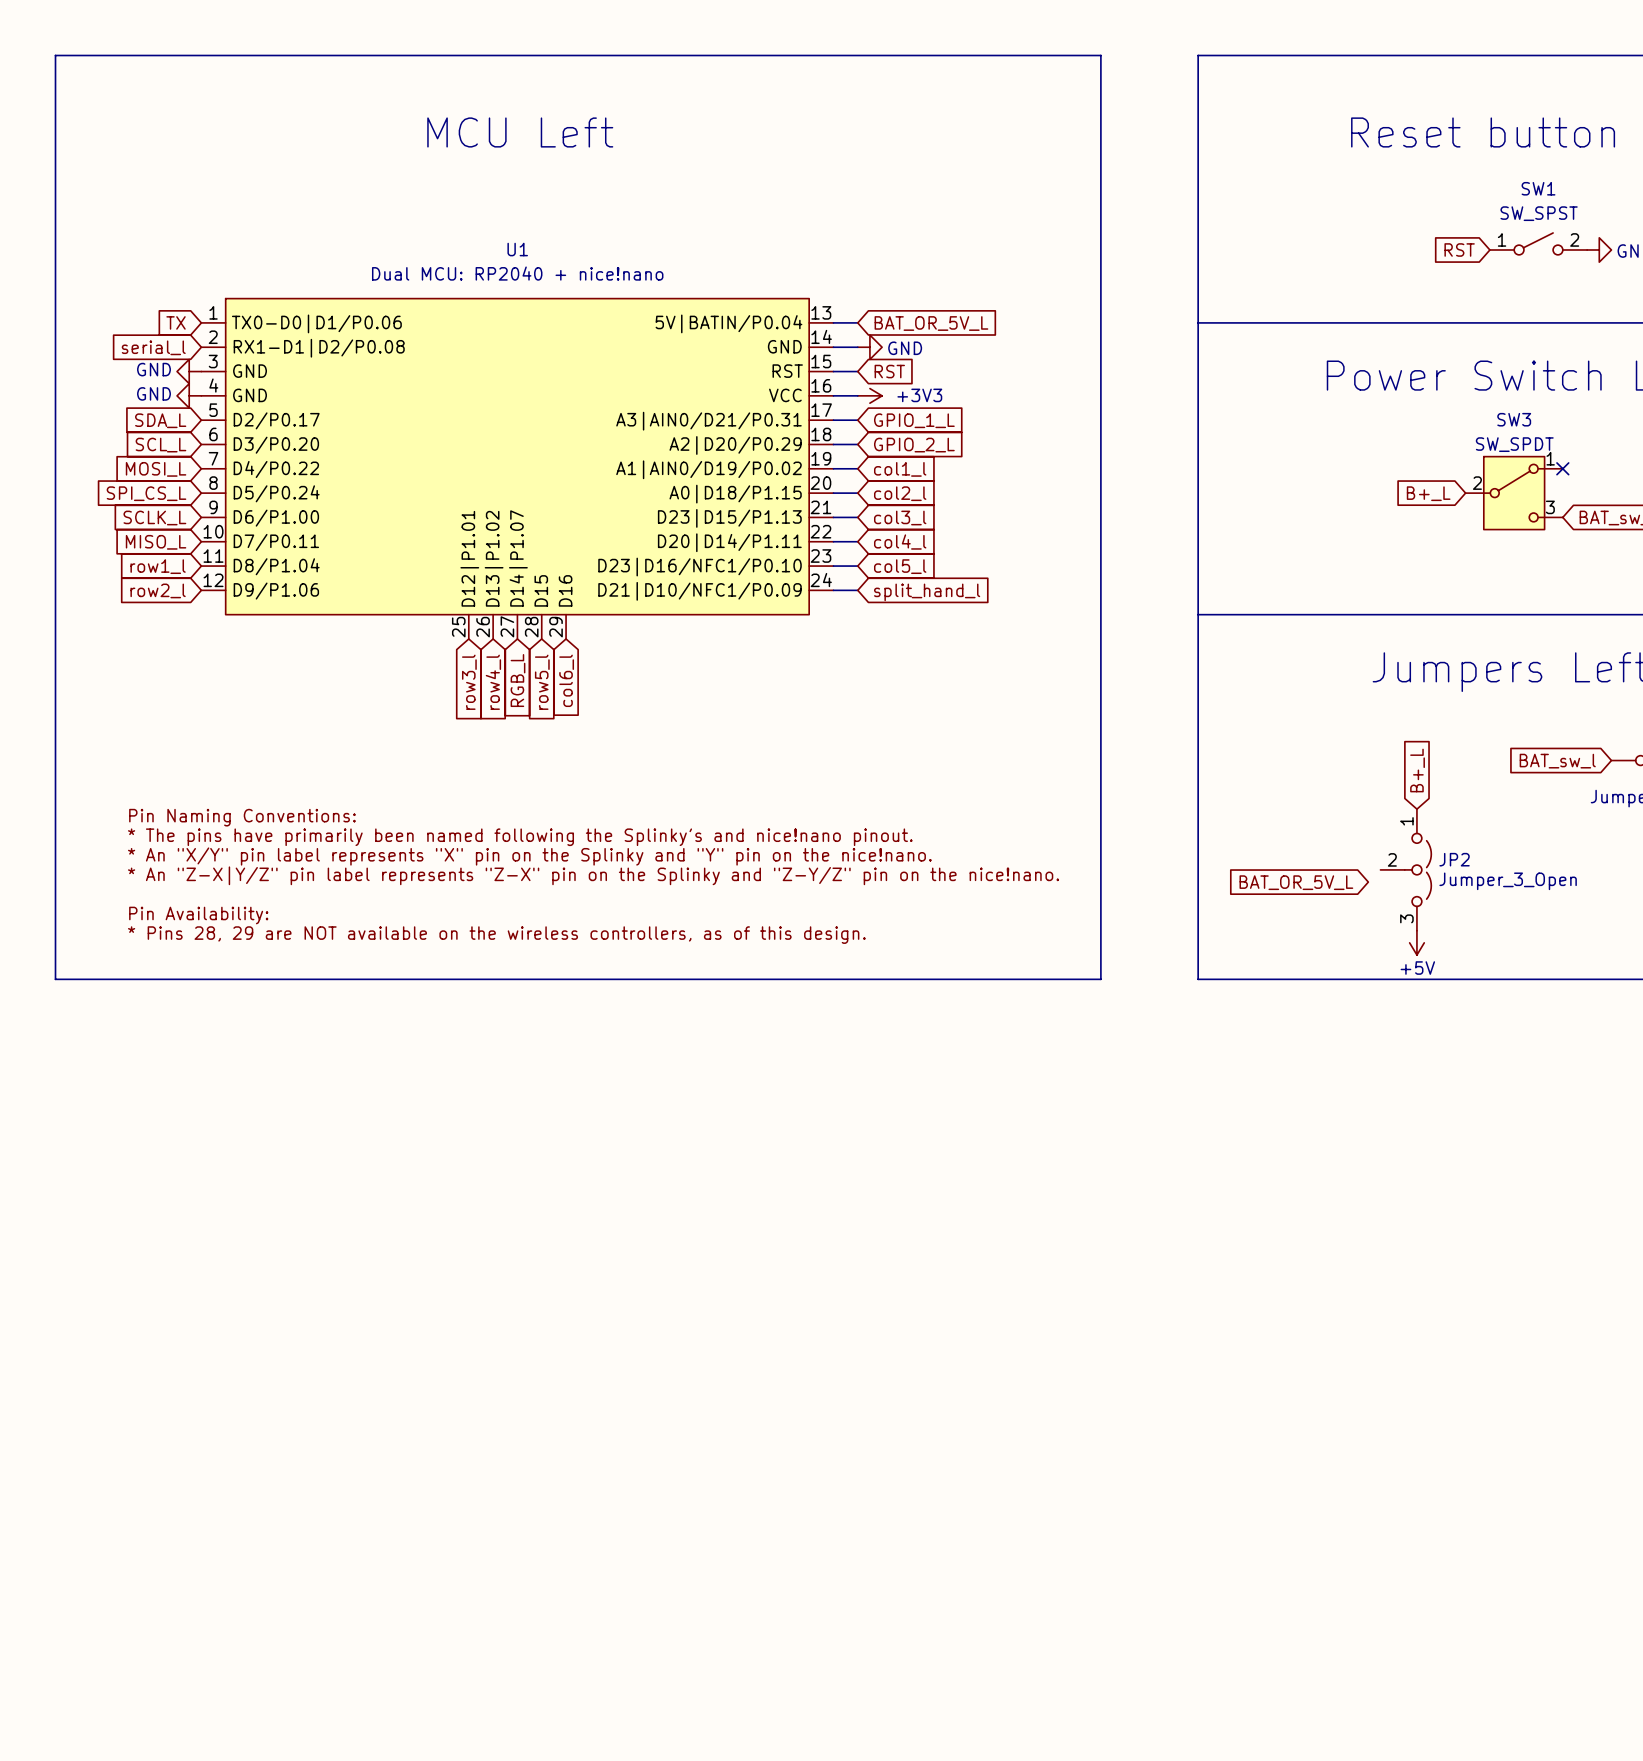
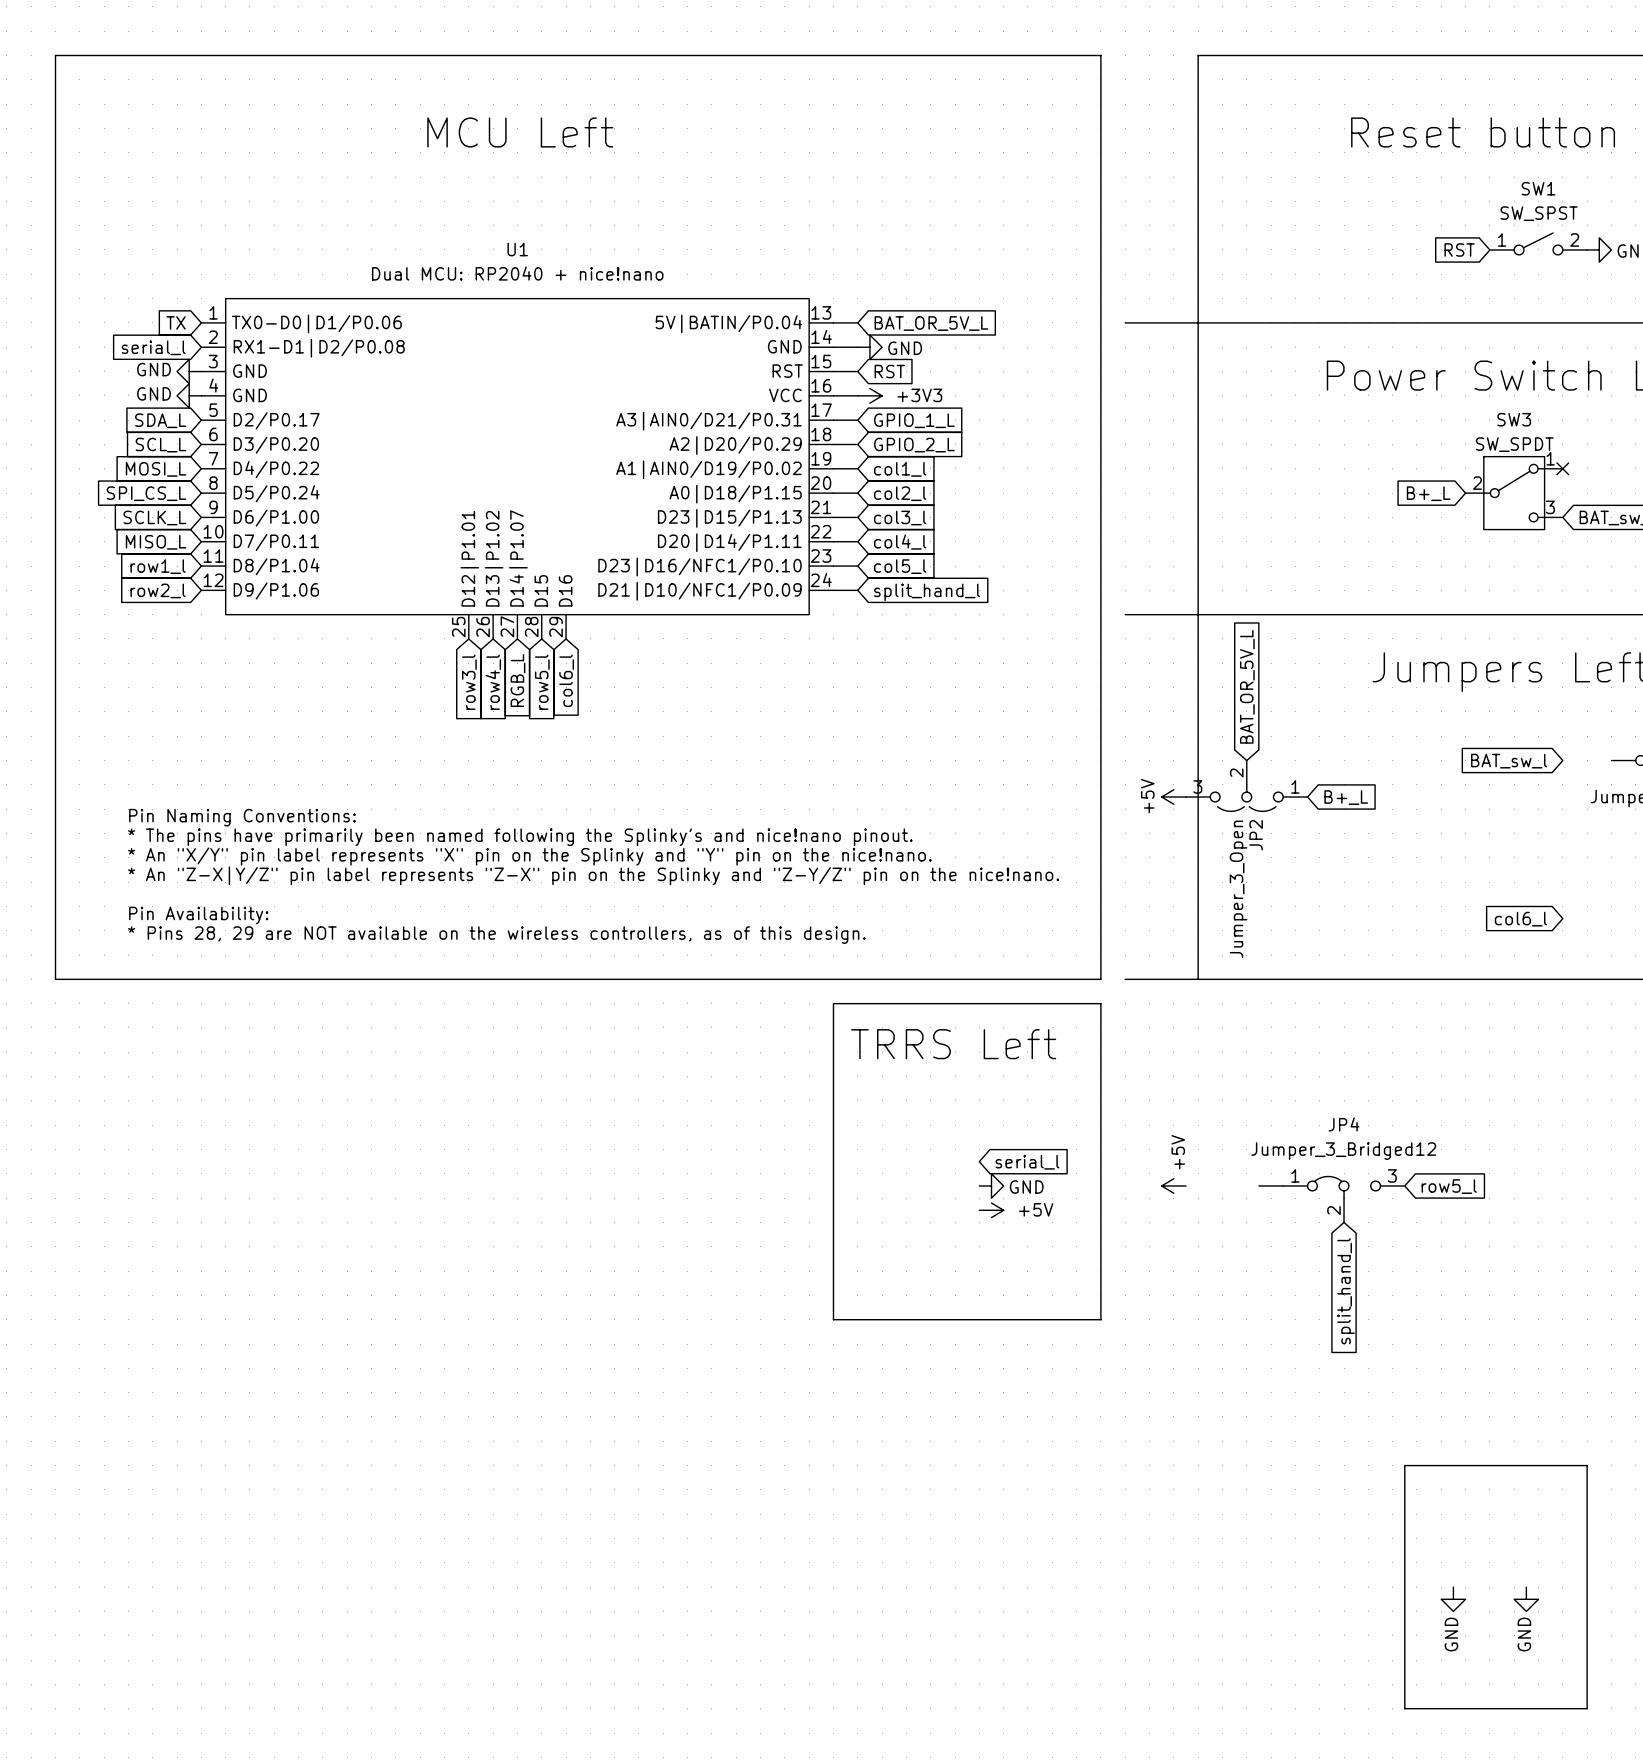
line: none -> (1125, 322) (1198, 322)
line: none -> (1125, 614) (1198, 614)
global label: none -> BAT_OR_5V_L (1247, 686)
global label position: BAT_sw_l (1557, 761) -> BAT_sw_l (1509, 761)
global label rotation: 0° (1417, 770) -> 90° clockwise (1346, 797)
power symbol: none -> +5V (1173, 797)
JP2 position: (1405, 869) -> (1246, 785)
JP2 rotation: 0° (1418, 869) -> 90° clockwise (1246, 798)
global label: BAT_OR_5V_L (1296, 882) -> none
global label: none -> col6_l (1520, 919)
power symbol: +5V (1416, 942) -> none
line: none -> (1125, 979) (1198, 979)
line: none -> (833, 1003) (833, 1319) (1100, 1319) (1100, 1003) (833, 1003)
text: none -> TRRS Left (953, 1044)
global label: none -> serial_l (1027, 1162)
power symbol: none -> GND (991, 1185)
power symbol: none -> +5V (1173, 1185)
wire: none -> (1258, 1185) (1283, 1185)
global label: none -> row5_l (1449, 1186)
JP4: none -> Jumper_3_Bridged12 (1344, 1199)
power symbol: none -> +5V (991, 1210)
global label: none -> split_hand_l (1346, 1291)
line: none -> (1404, 1465) (1404, 1708) (1587, 1708) (1587, 1465) (1404, 1465)
power symbol: none -> GND (1453, 1599)
power symbol: none -> GND (1526, 1599)

